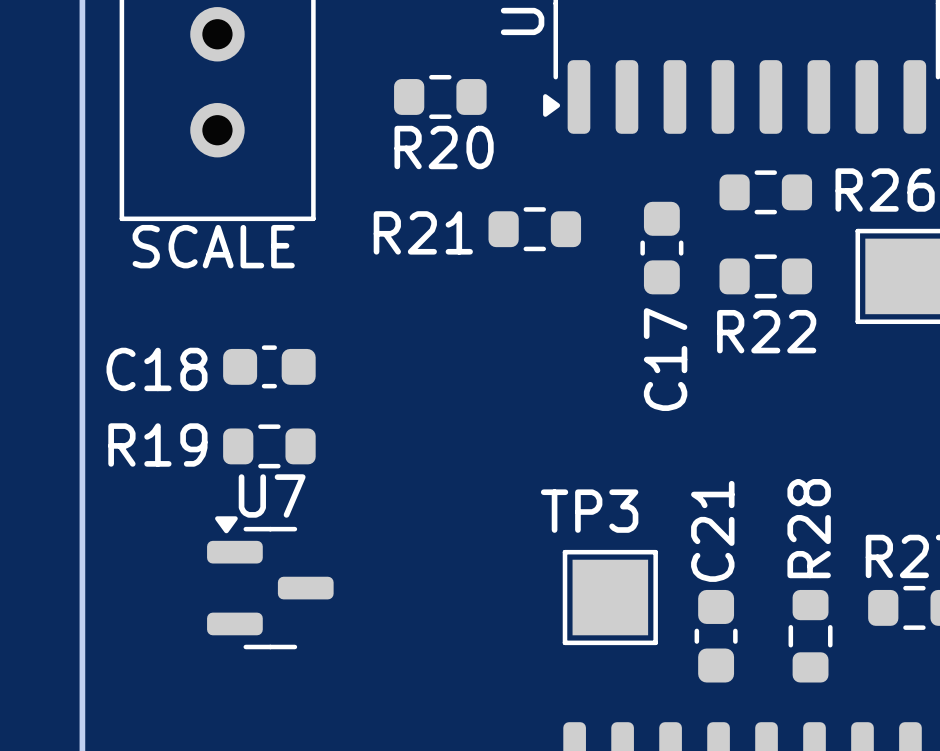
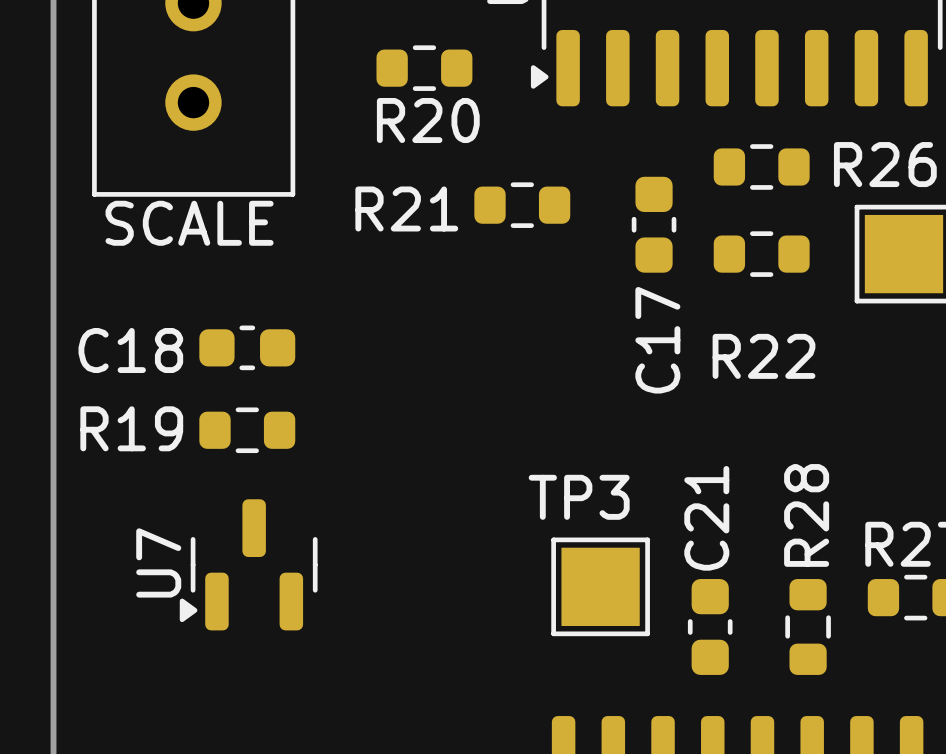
R22 name position: R22 (766, 331) -> R22 (764, 356)
U7 rotation: 0° (270, 582) -> 90° counterclockwise (248, 564)

